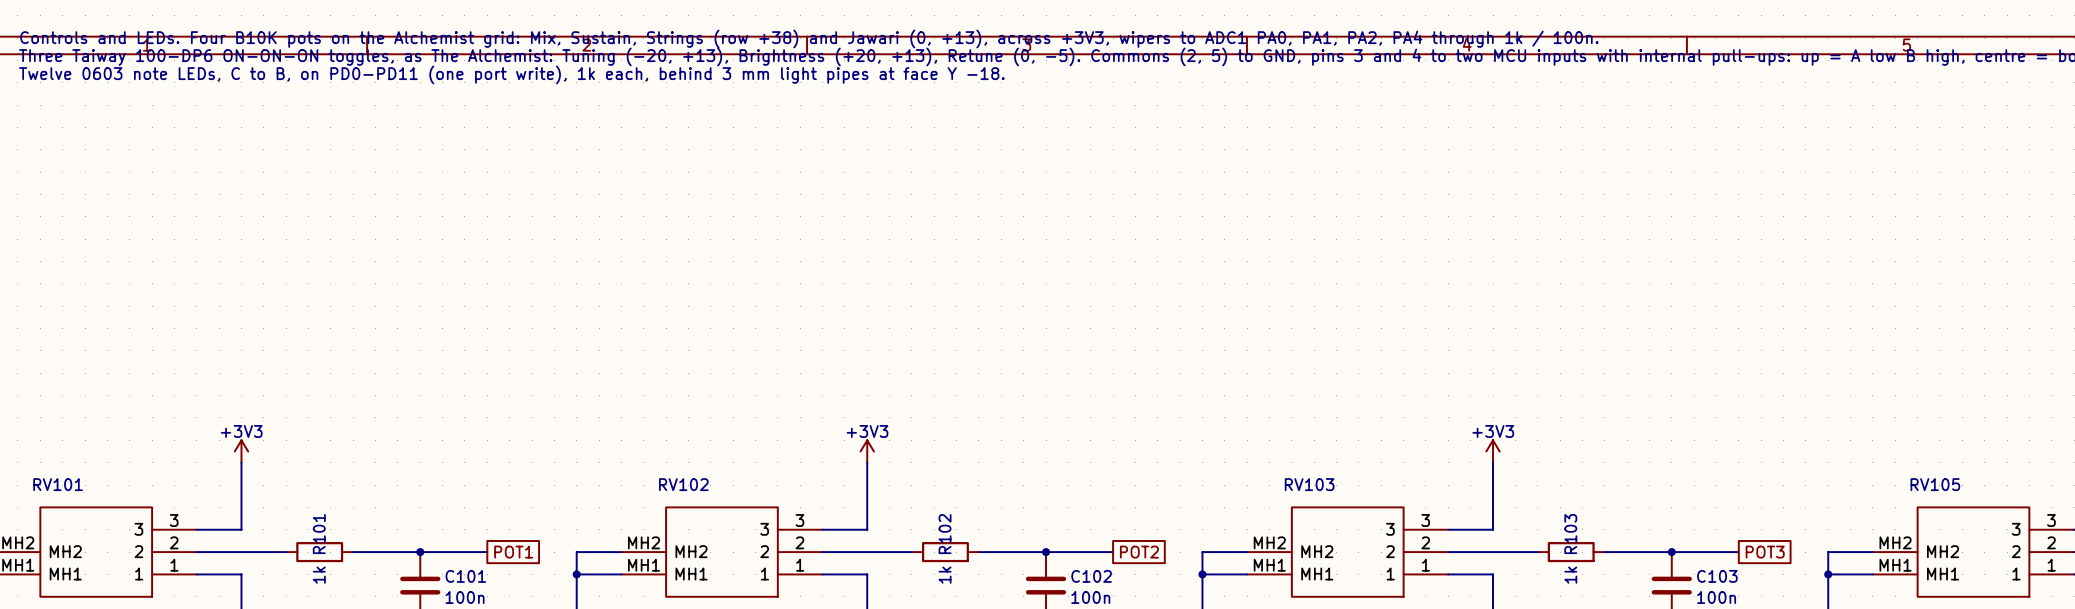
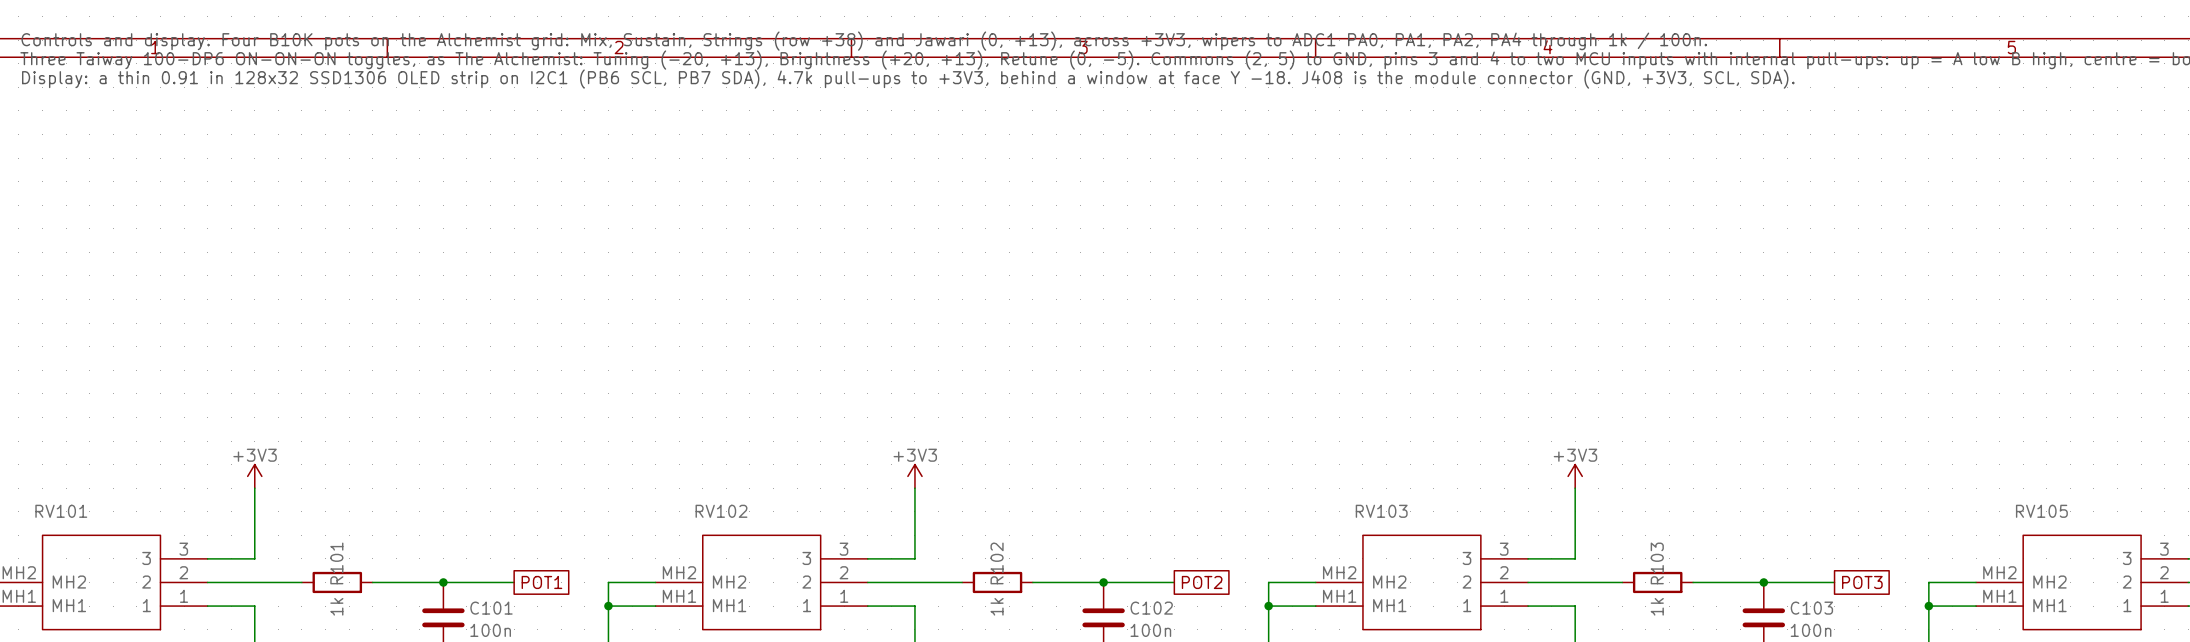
text: Controls and LEDs. Four B10K pots on the Alchemist grid: Mix, Sustain, Strings (row +38) and Jawari (0, +13), across +3V3, wipers to ADC1 PA0, PA1, PA2, PA4 through 1k / 100n. (809, 38) -> Controls and display. Four B10K pots on the Alchemist grid: Mix, Sustain, Strings (row +38) and Jawari (0, +13), across +3V3, wipers to ADC1 PA0, PA1, PA2, PA4 through 1k / 100n. (864, 41)
text: Twelve 0603 note LEDs, C to B, on PD0-PD11 (one port write), 1k each, behind 3 mm light pipes at face Y -18. (511, 74) -> Display: a thin 0.91 in 128x32 SSD1306 OLED strip on I2C1 (PB6 SCL, PB7 SDA), 4.7k pull-ups to +3V3, behind a window at face Y -18. J408 is the module connector (GND, +3V3, SCL, SDA). (908, 79)

